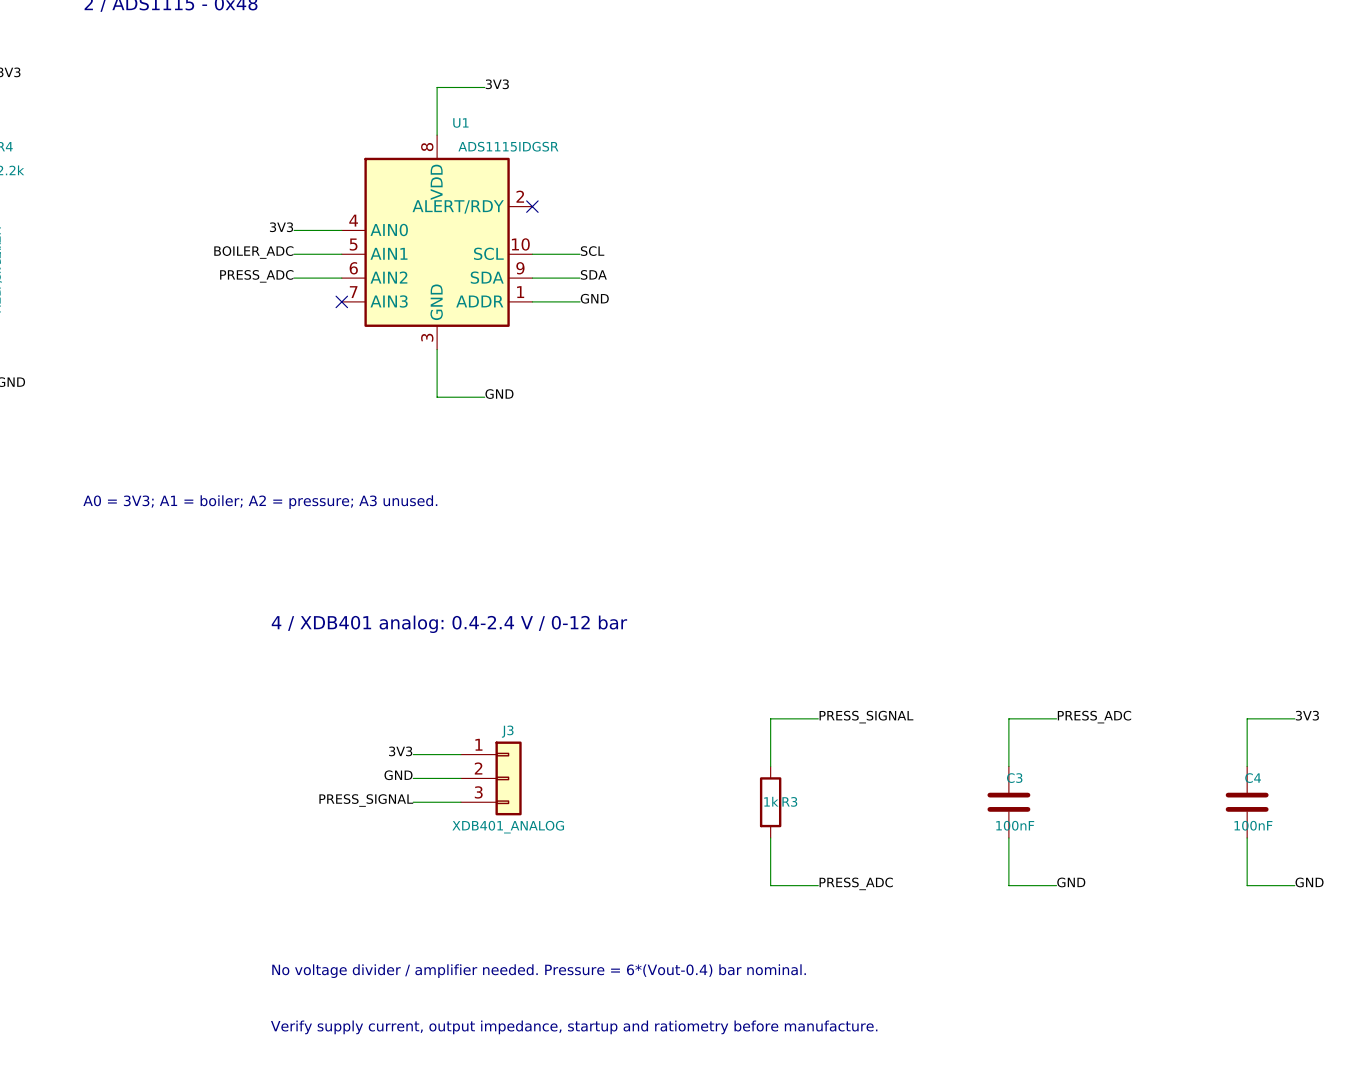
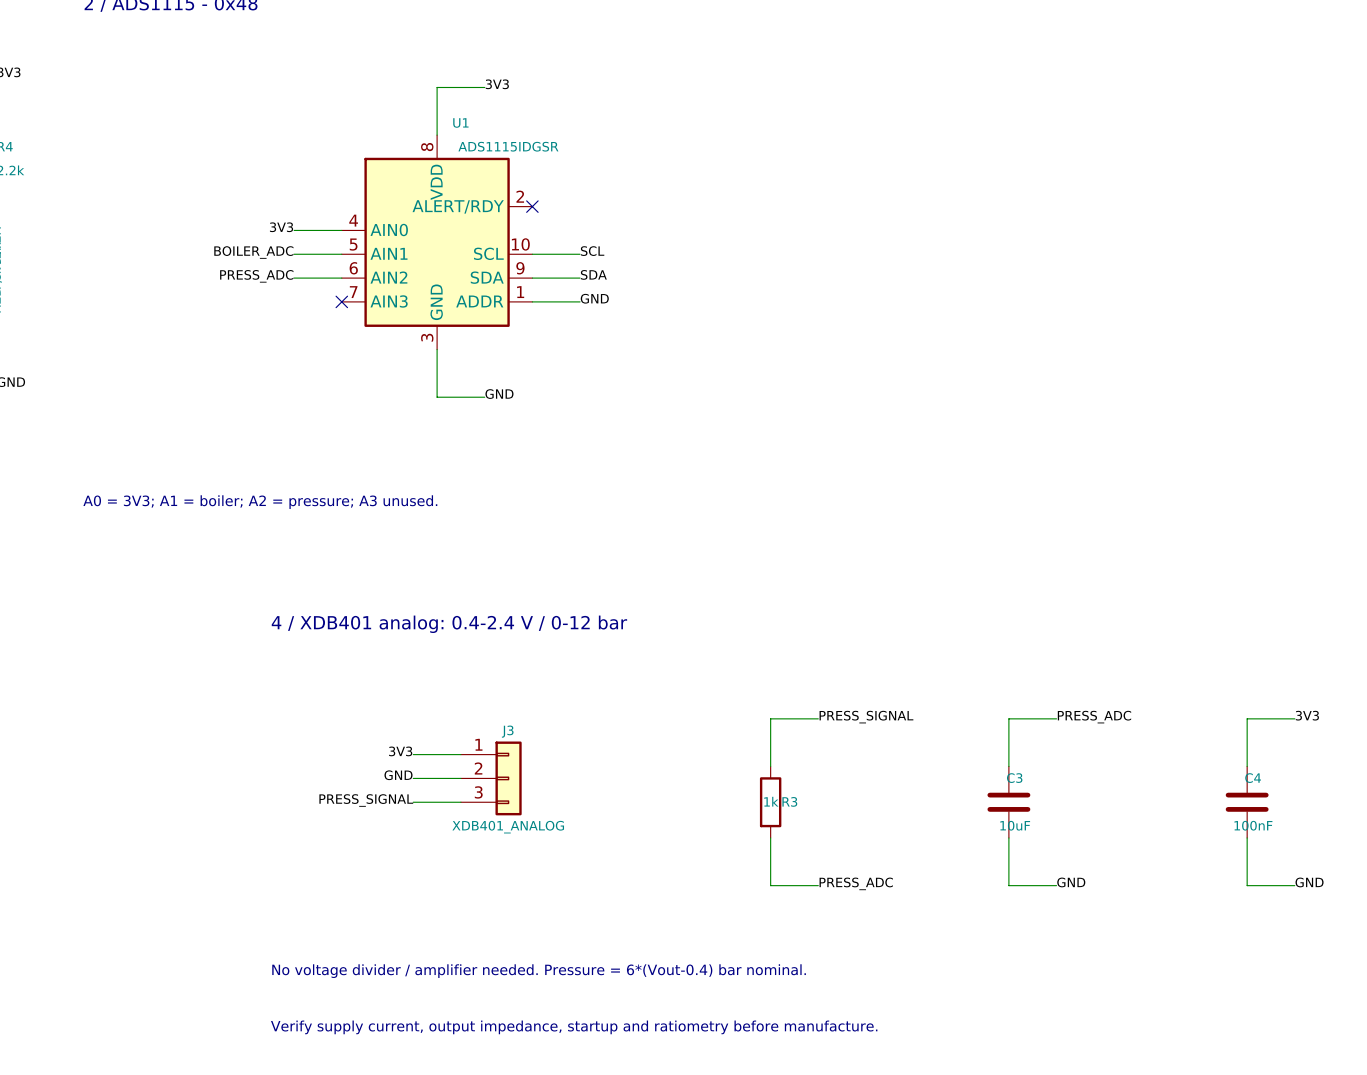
C3 value: 100nF (1015, 825) -> 10uF (1015, 825)

